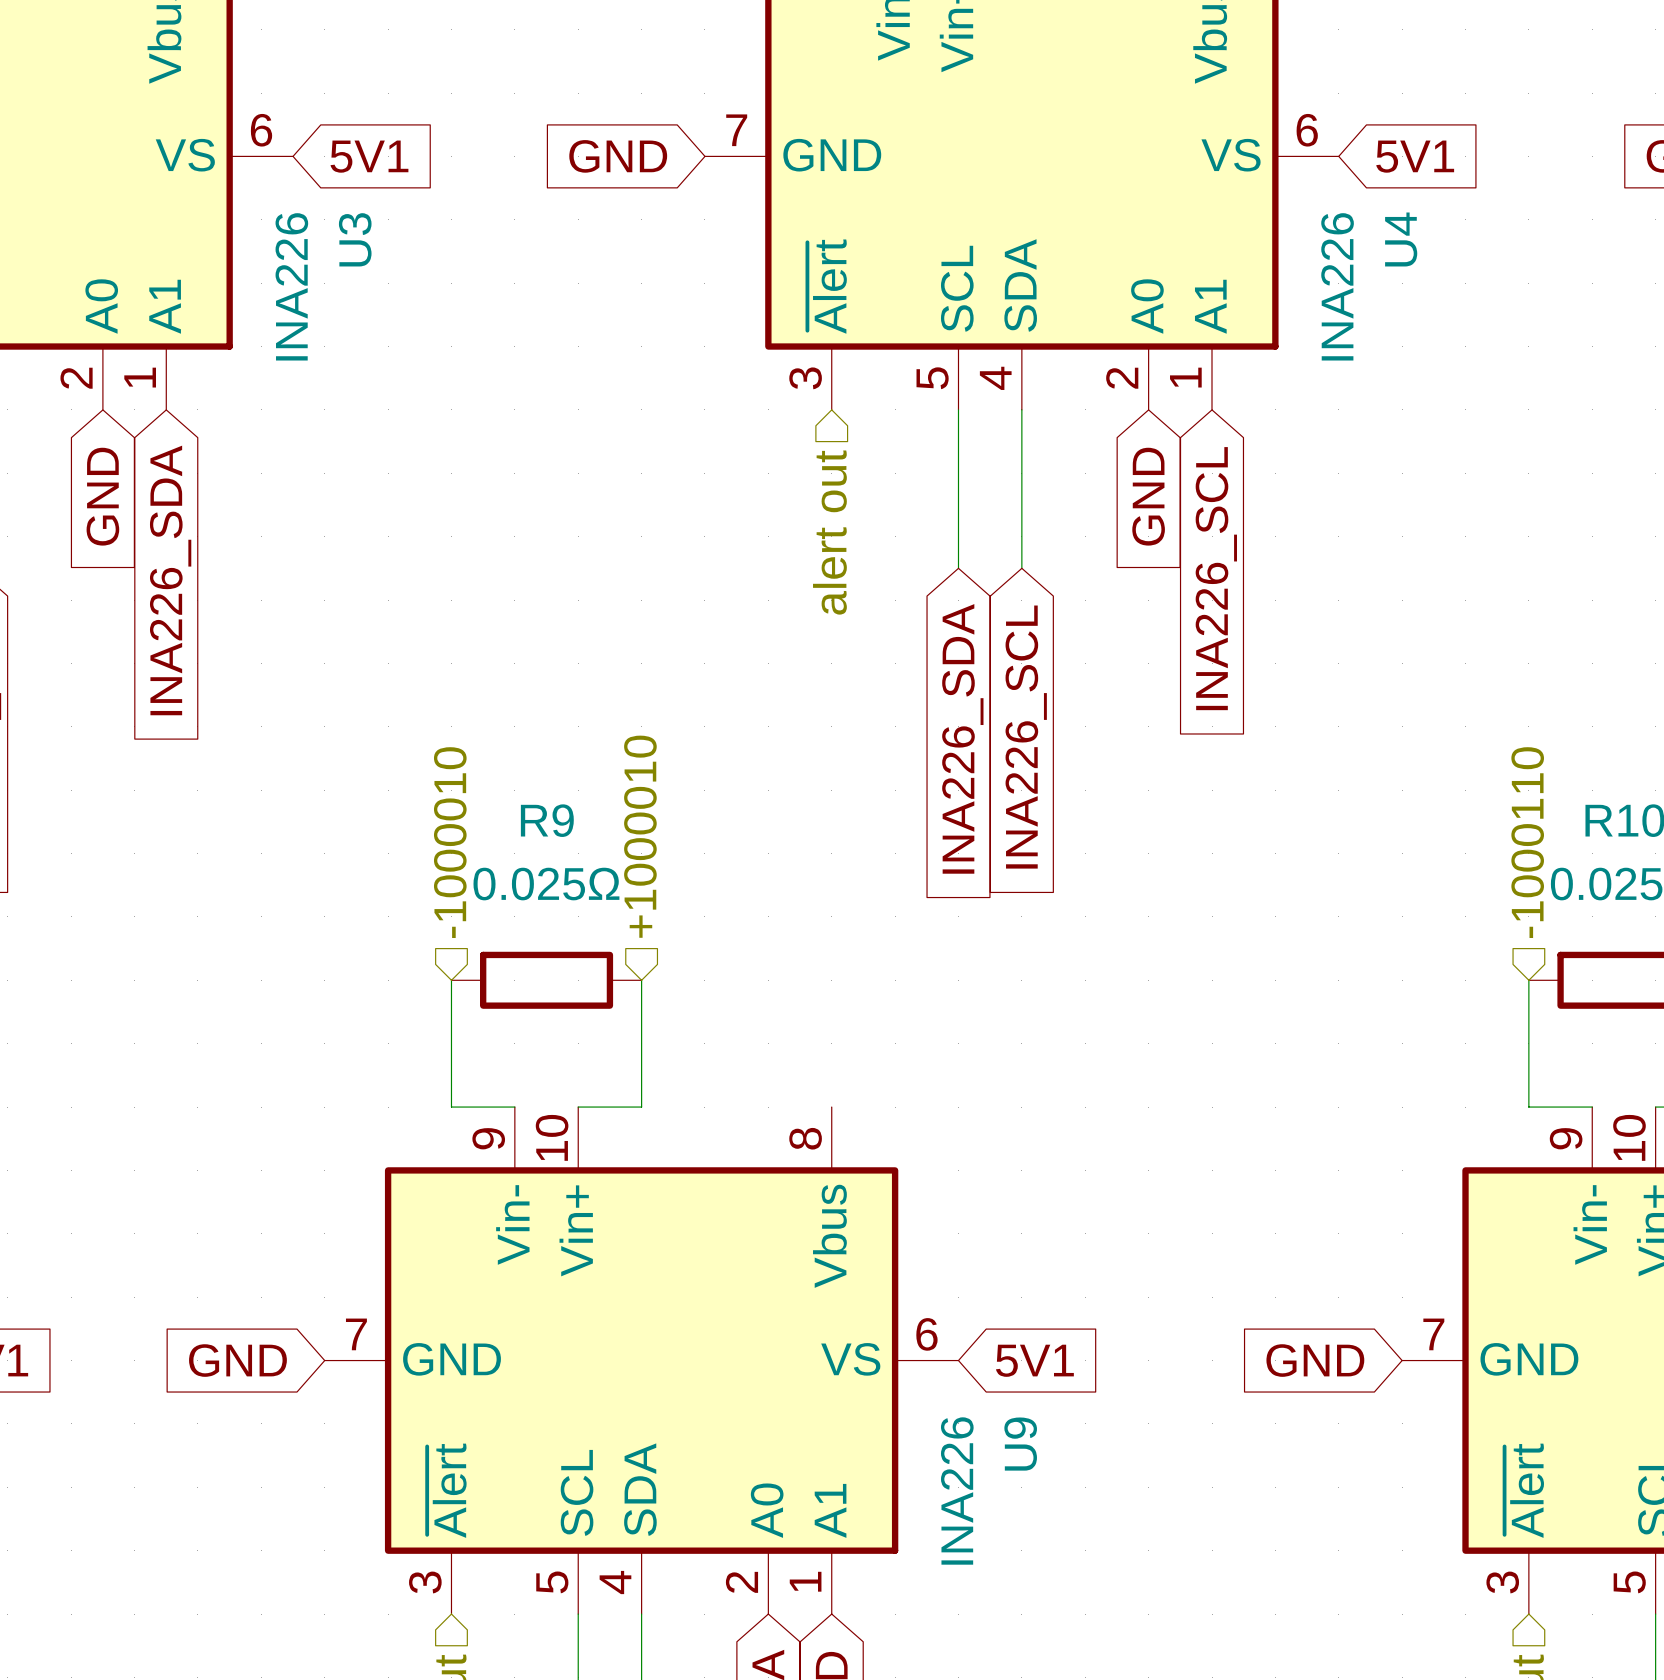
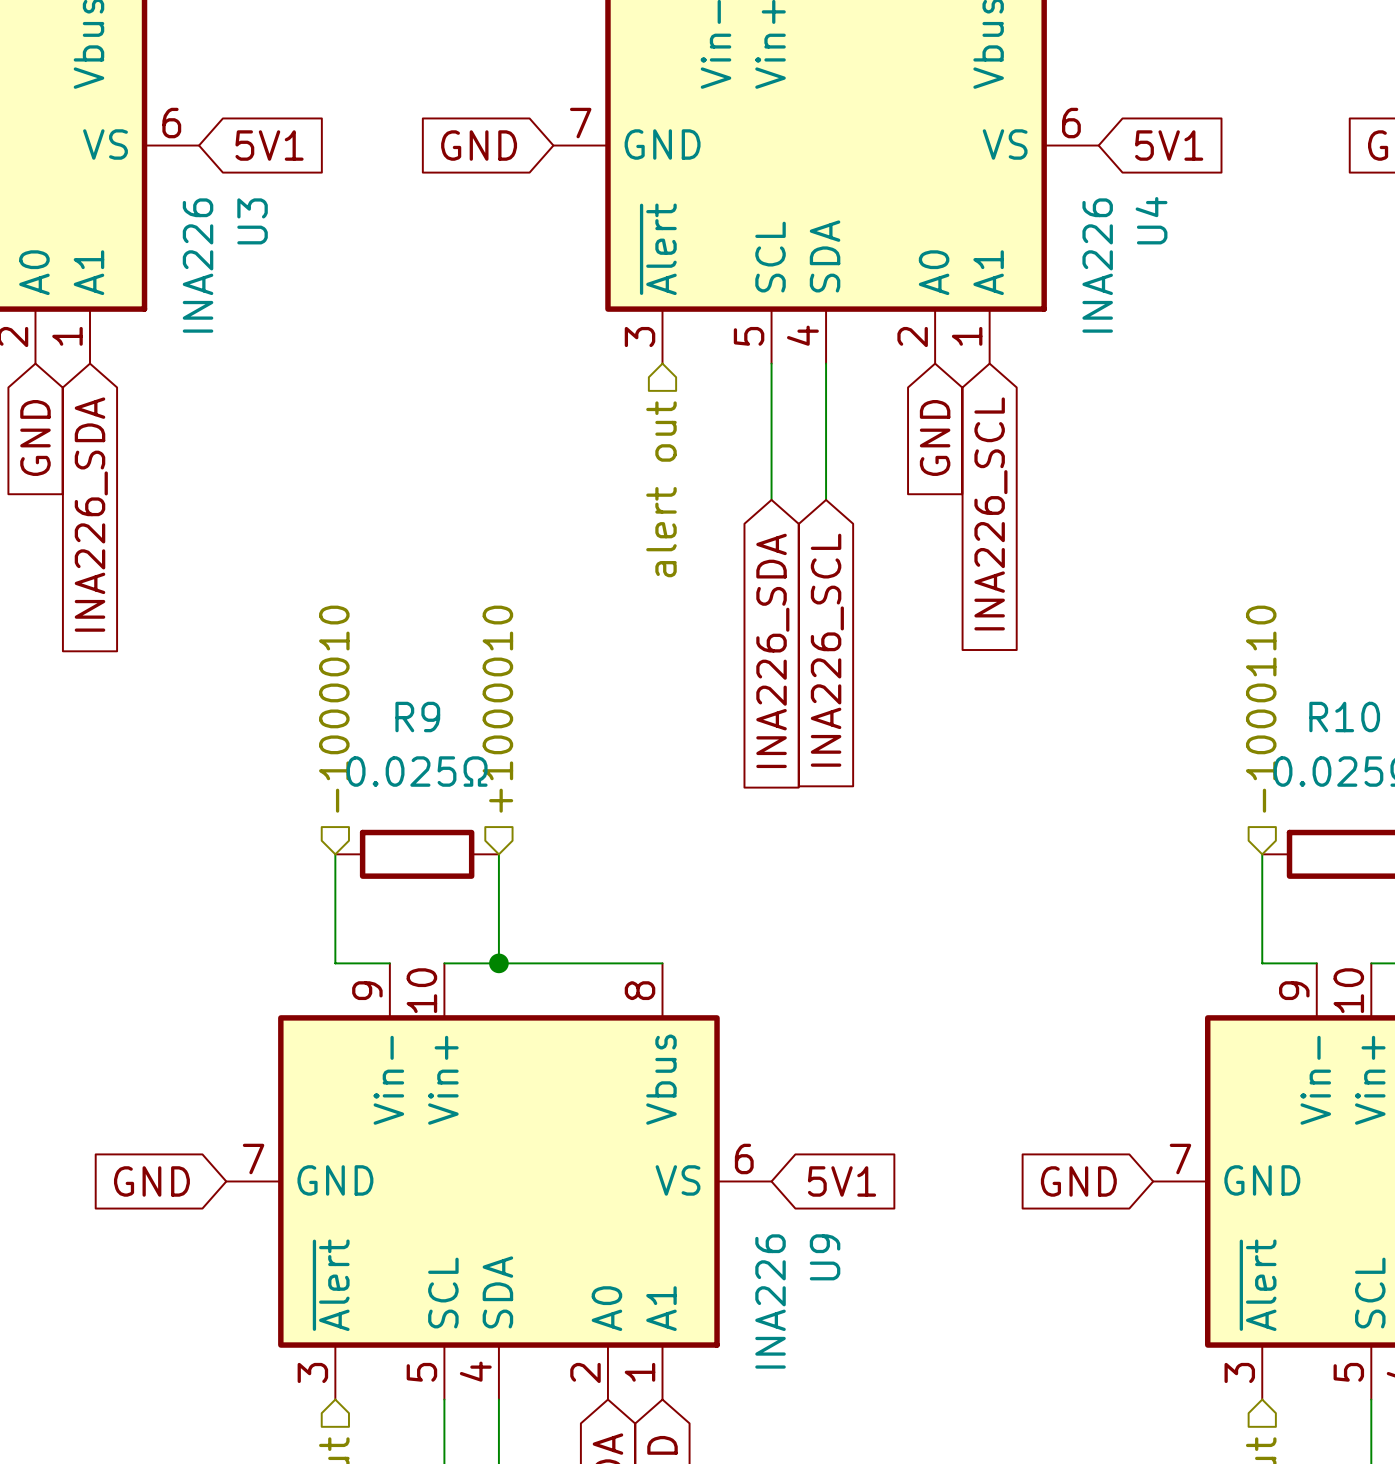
wire: none -> (498, 963) (662, 963)
junction: none -> (498, 963)

